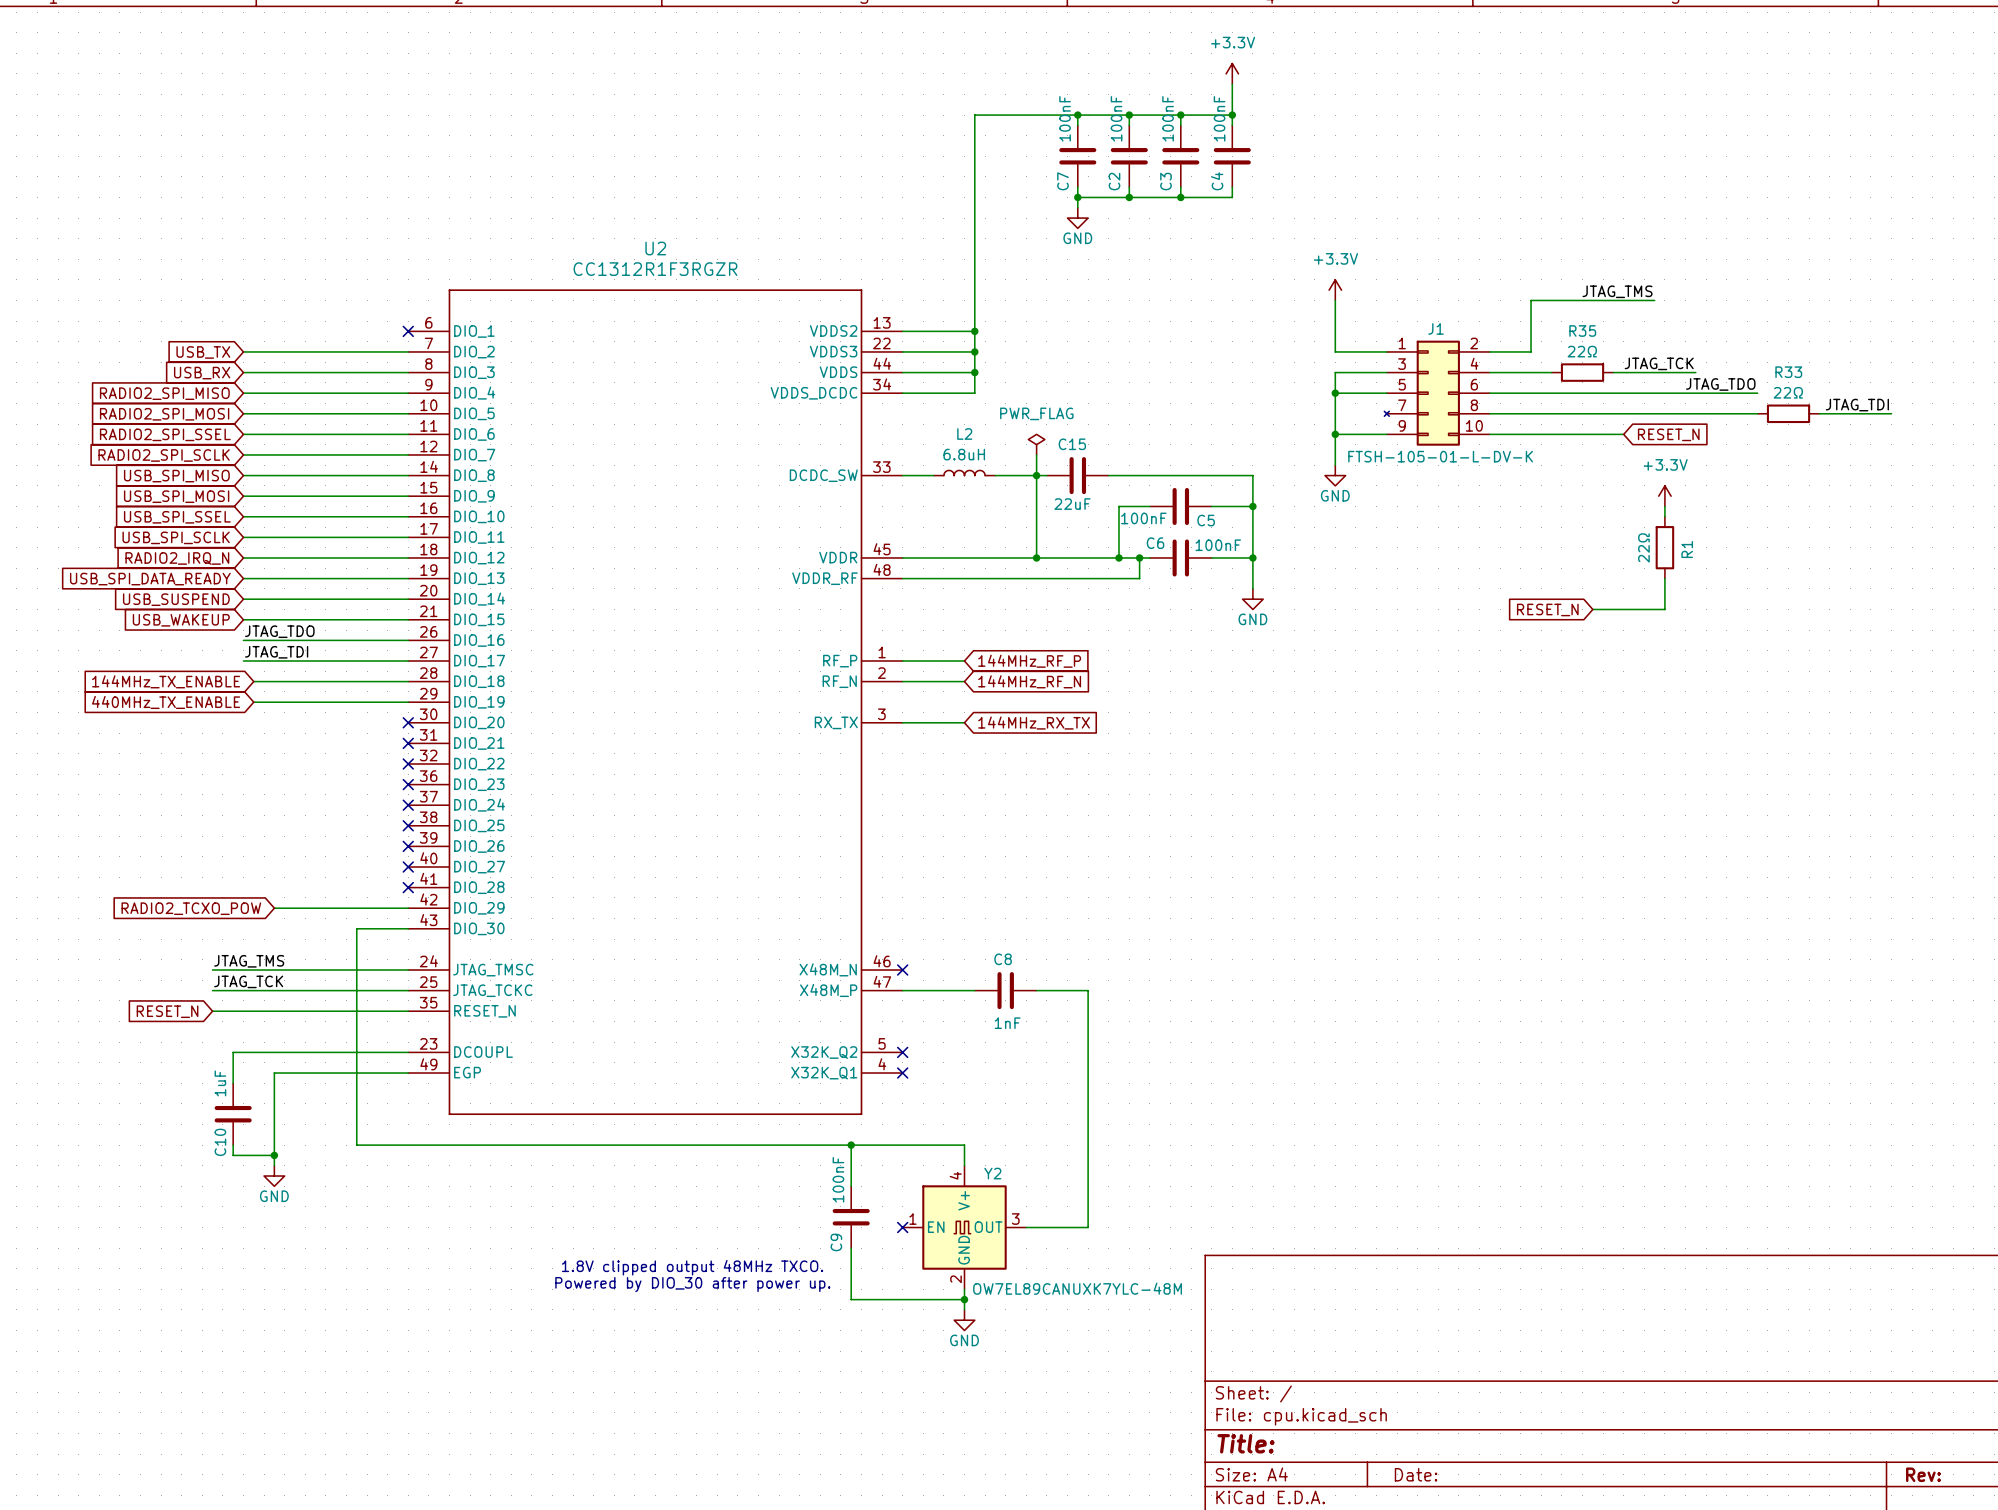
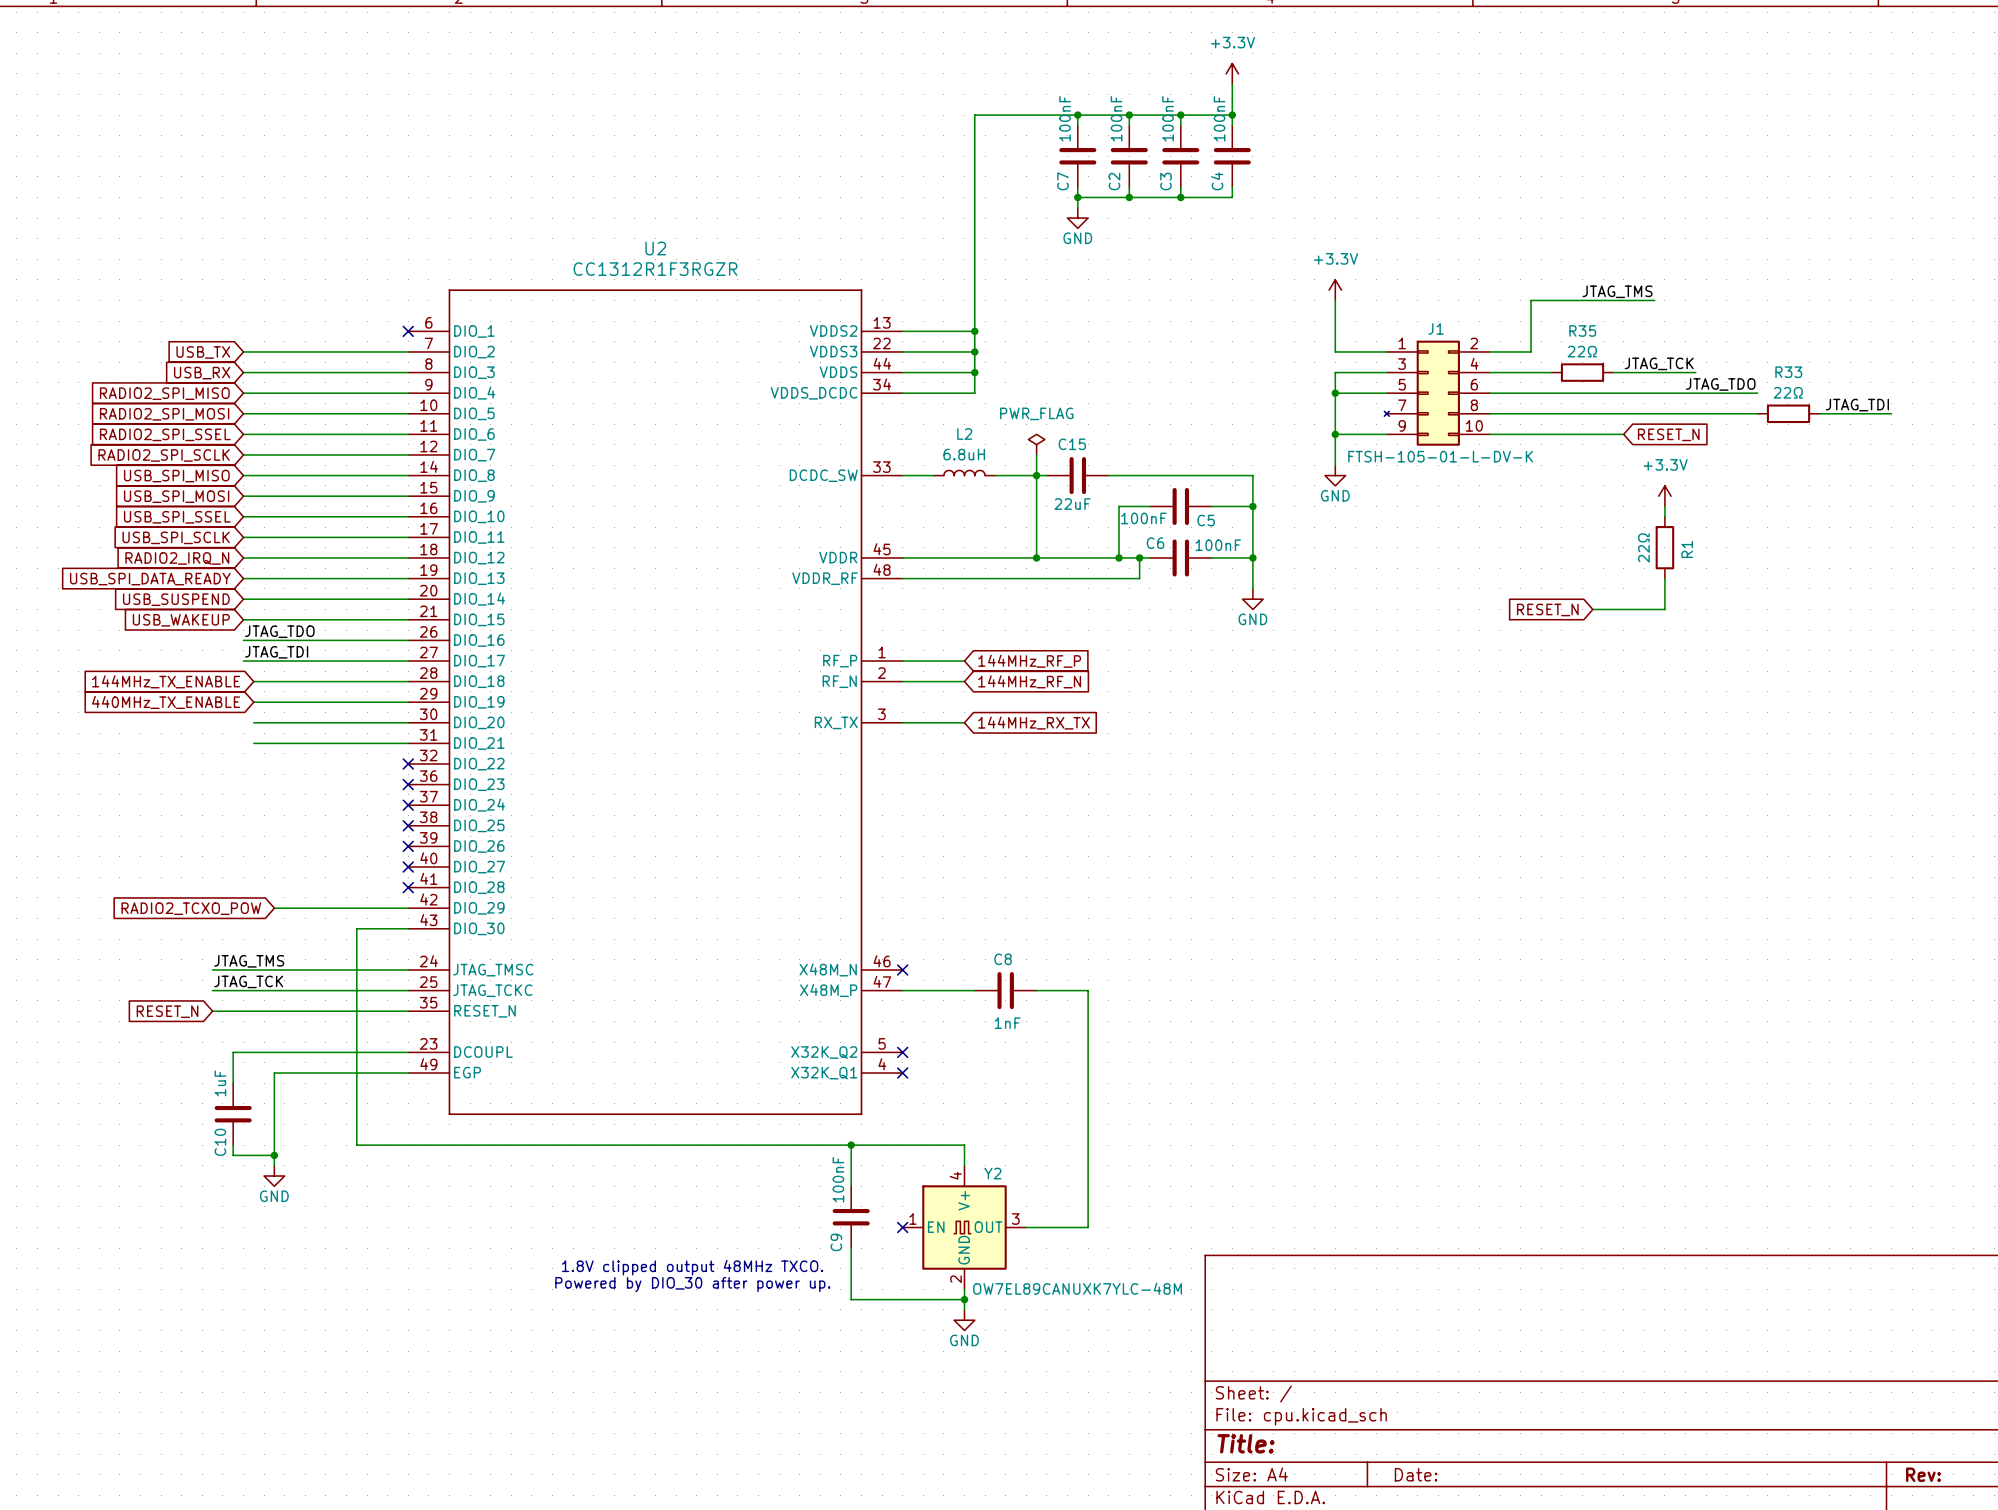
wire: none -> (253, 722) (408, 722)
no-connect mark: (408, 722) -> none
wire: none -> (253, 743) (408, 743)
no-connect mark: (408, 743) -> none

